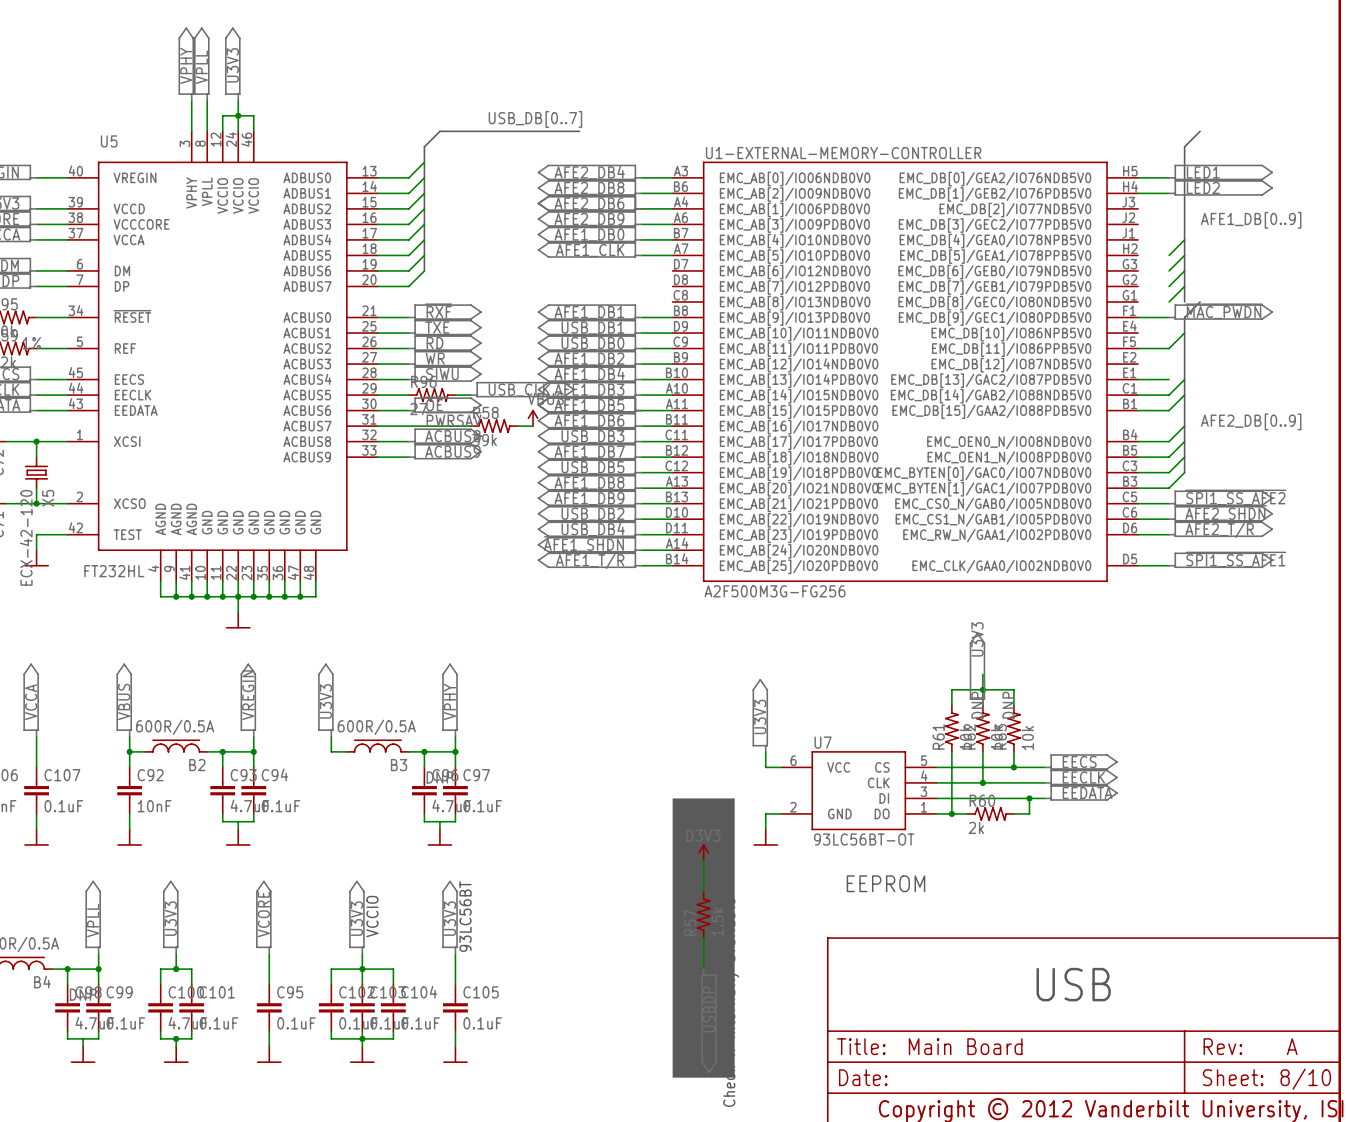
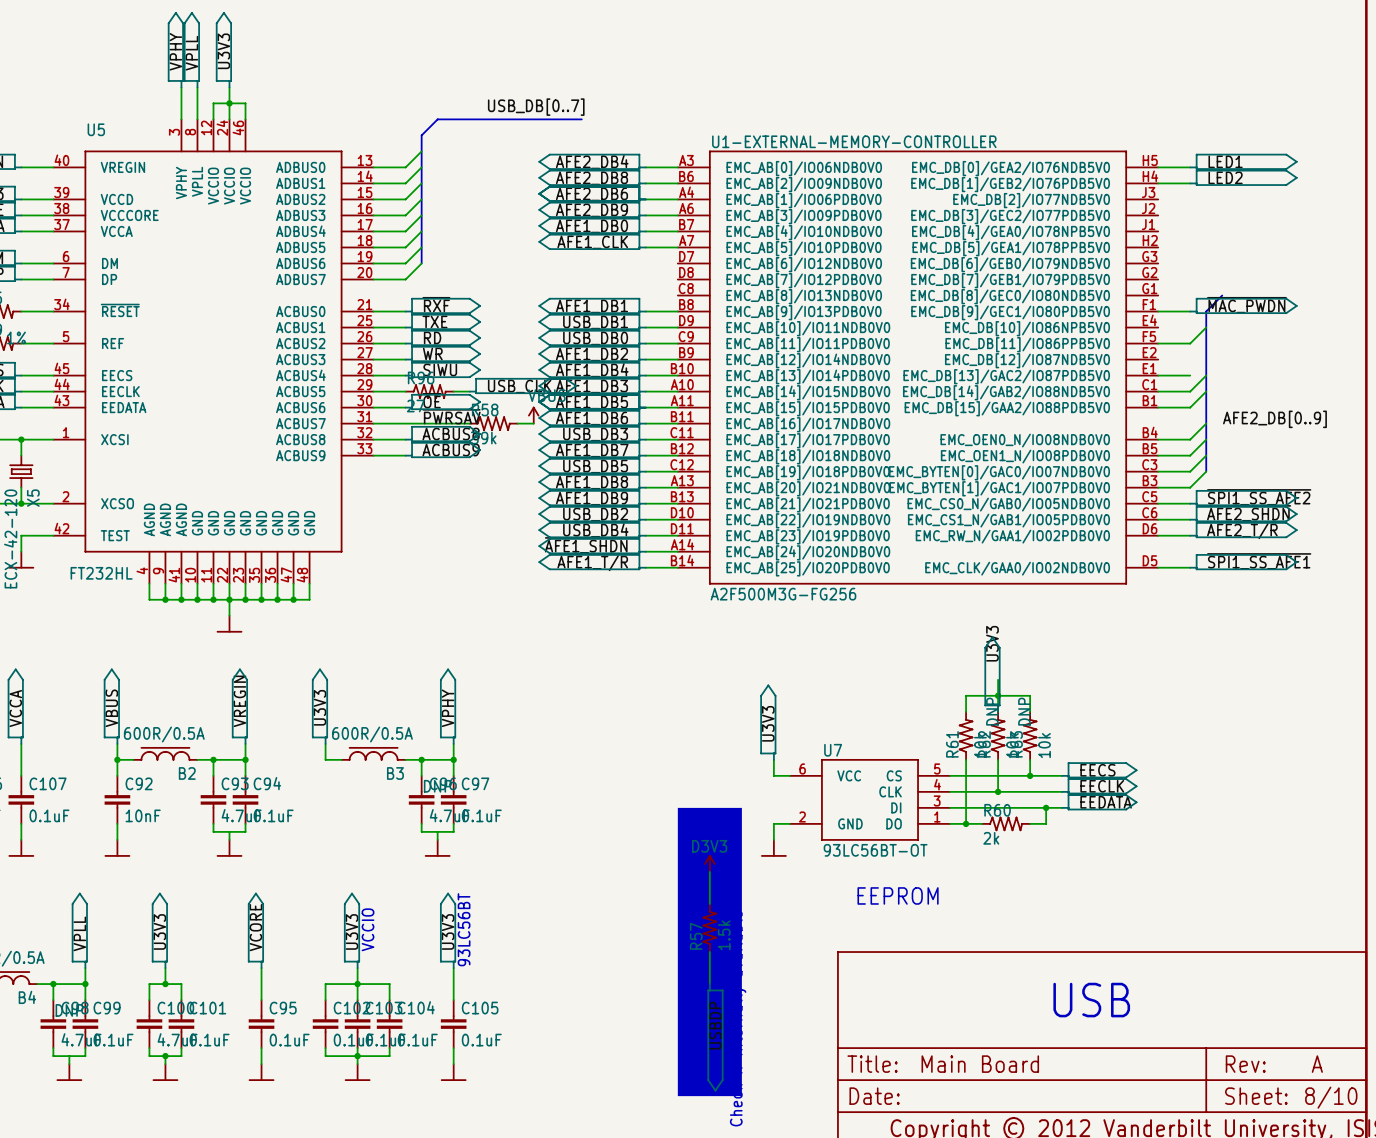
bus: (1200, 131) (1184, 146) (1184, 301) -> none
label: AFE1_DB[0..9] (1251, 220) -> none
wire: (1184, 239) (1169, 255) -> none
wire: (1184, 255) (1169, 270) -> none
wire: (1184, 270) (1169, 286) -> none
wire: (1184, 286) (1169, 301) -> none

